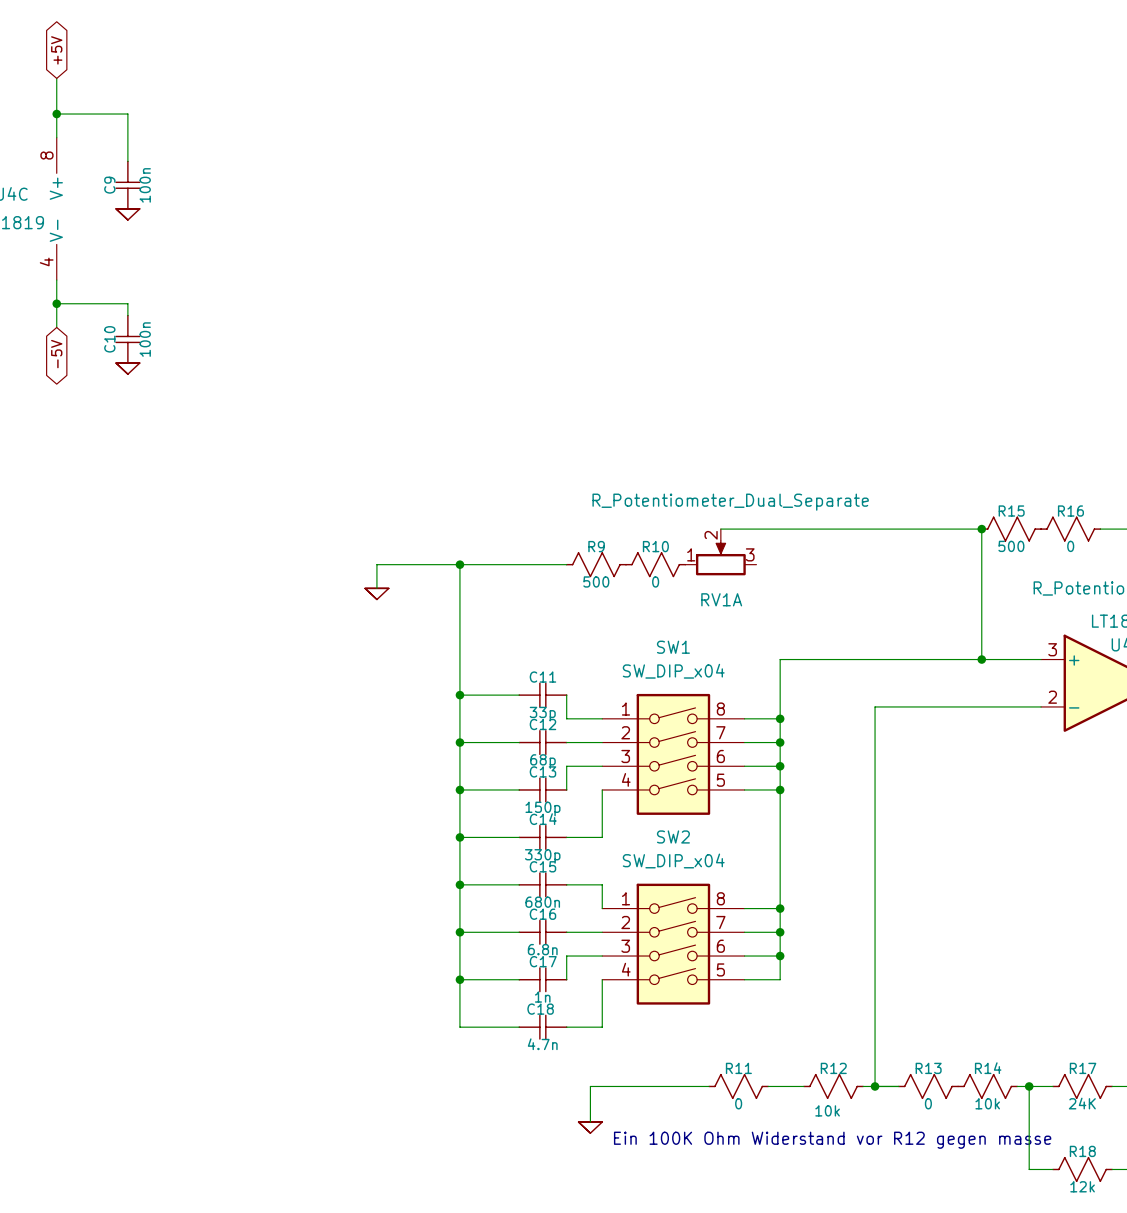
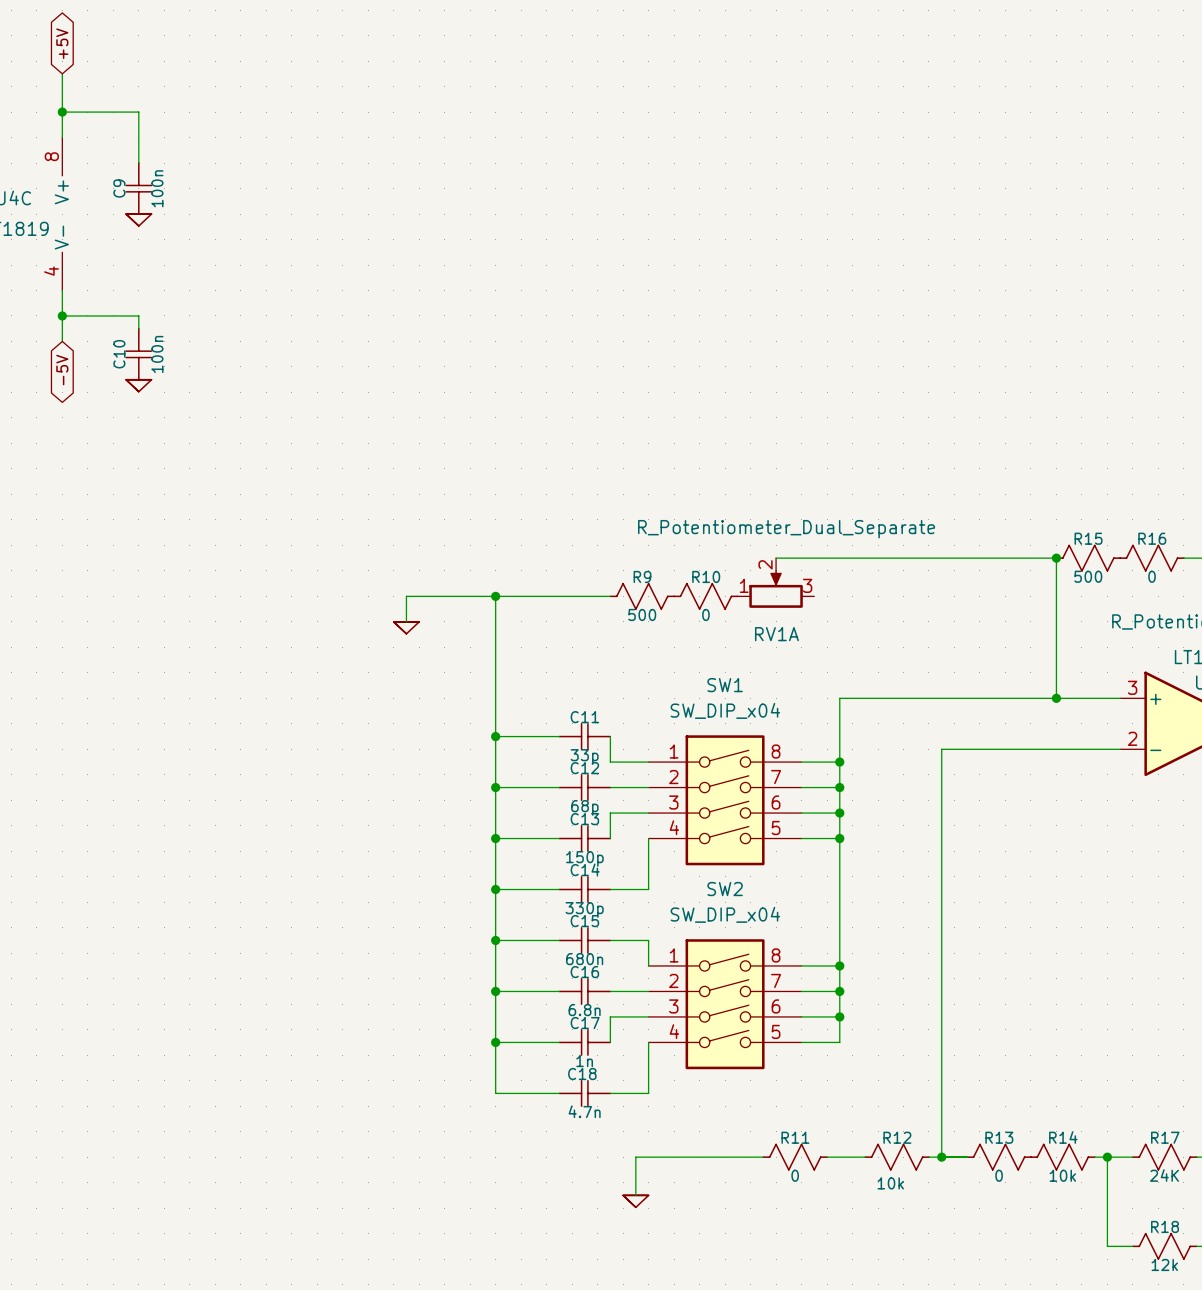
text: Ein 100K Ohm Widerstand vor R12 gegen masse (832, 1140) -> none

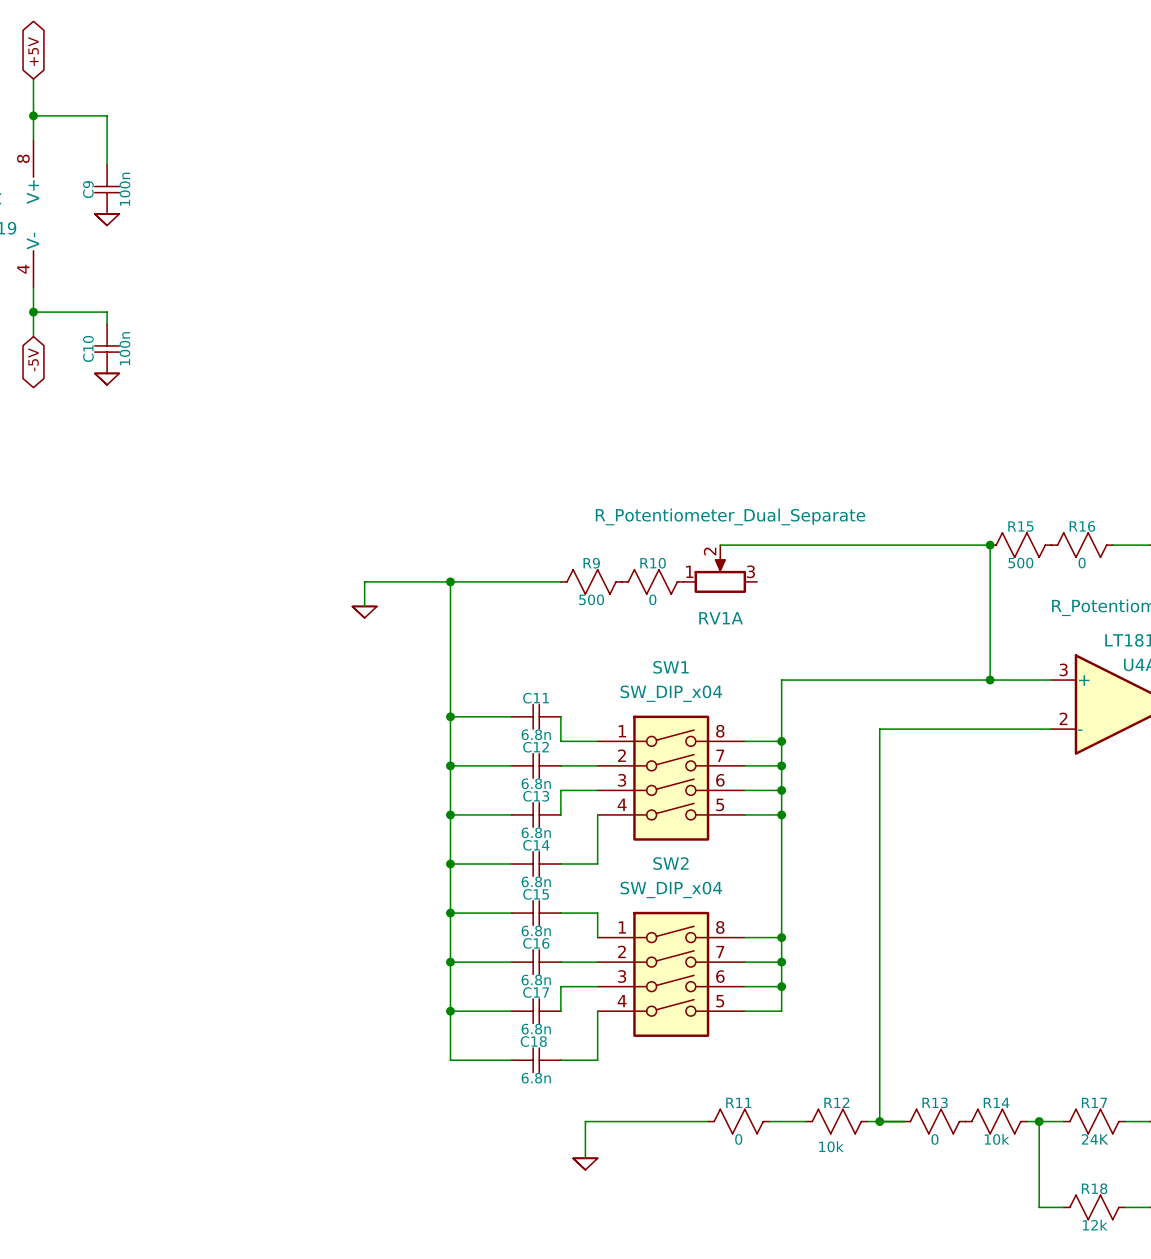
C11 value: 33p (584, 756) -> 6.8n (536, 734)
C12 value: 68p (584, 807) -> 6.8n (536, 783)
C13 value: 150p (584, 858) -> 6.8n (536, 832)
C14 value: 330p (584, 909) -> 6.8n (536, 881)
C15 value: 680n (584, 959) -> 6.8n (536, 930)
C17 value: 1n (584, 1061) -> 6.8n (536, 1029)
C18 value: 4.7n (584, 1111) -> 6.8n (536, 1078)

